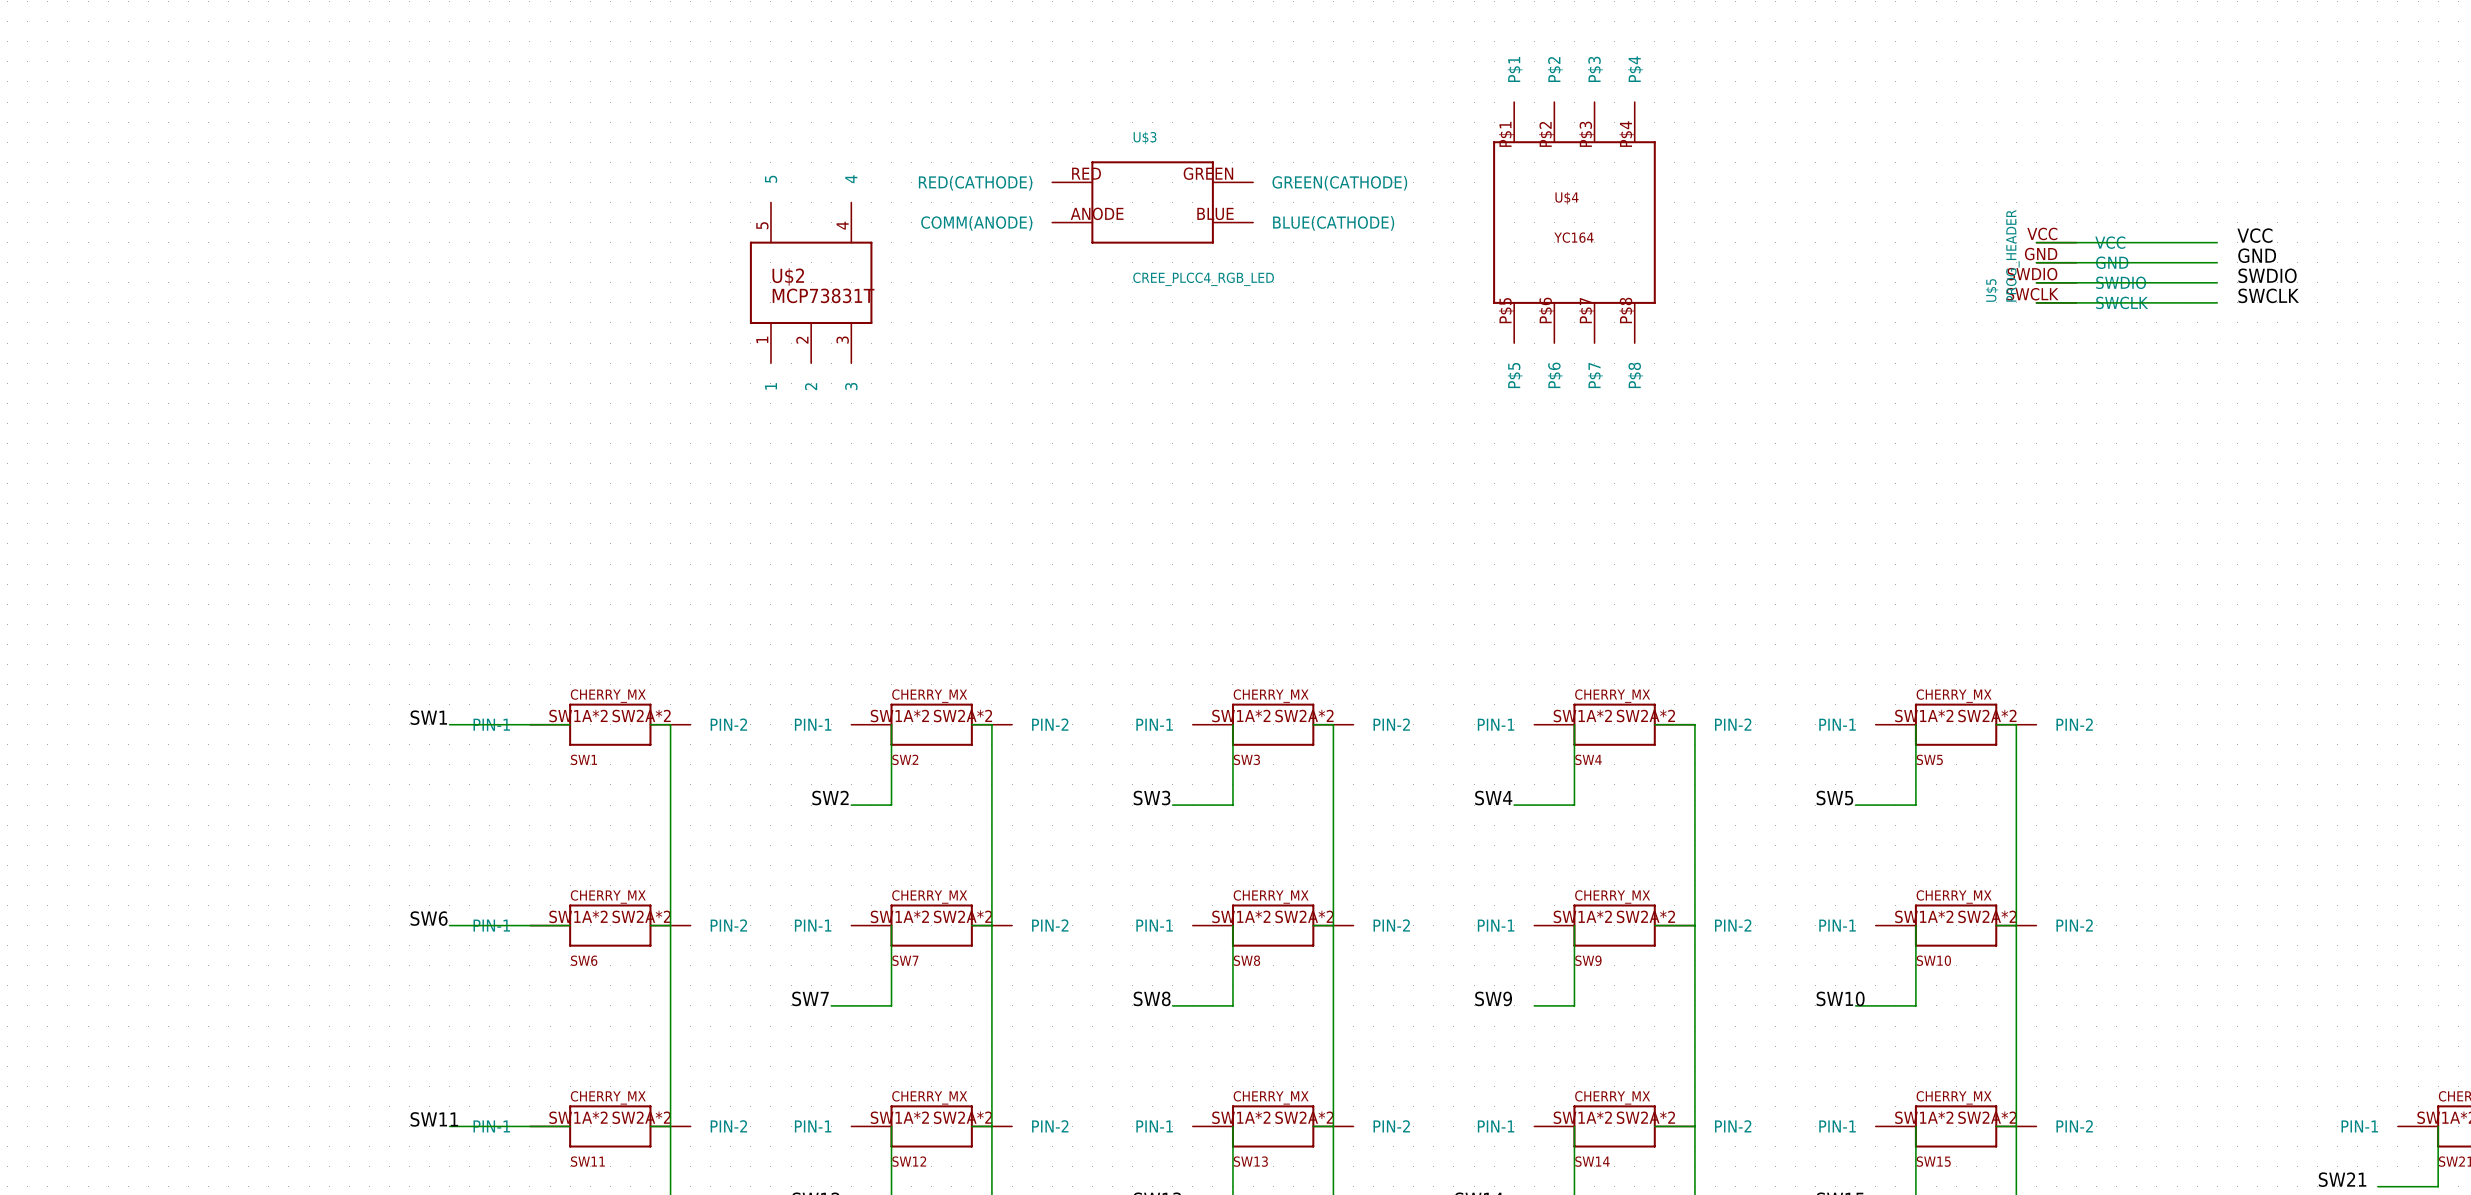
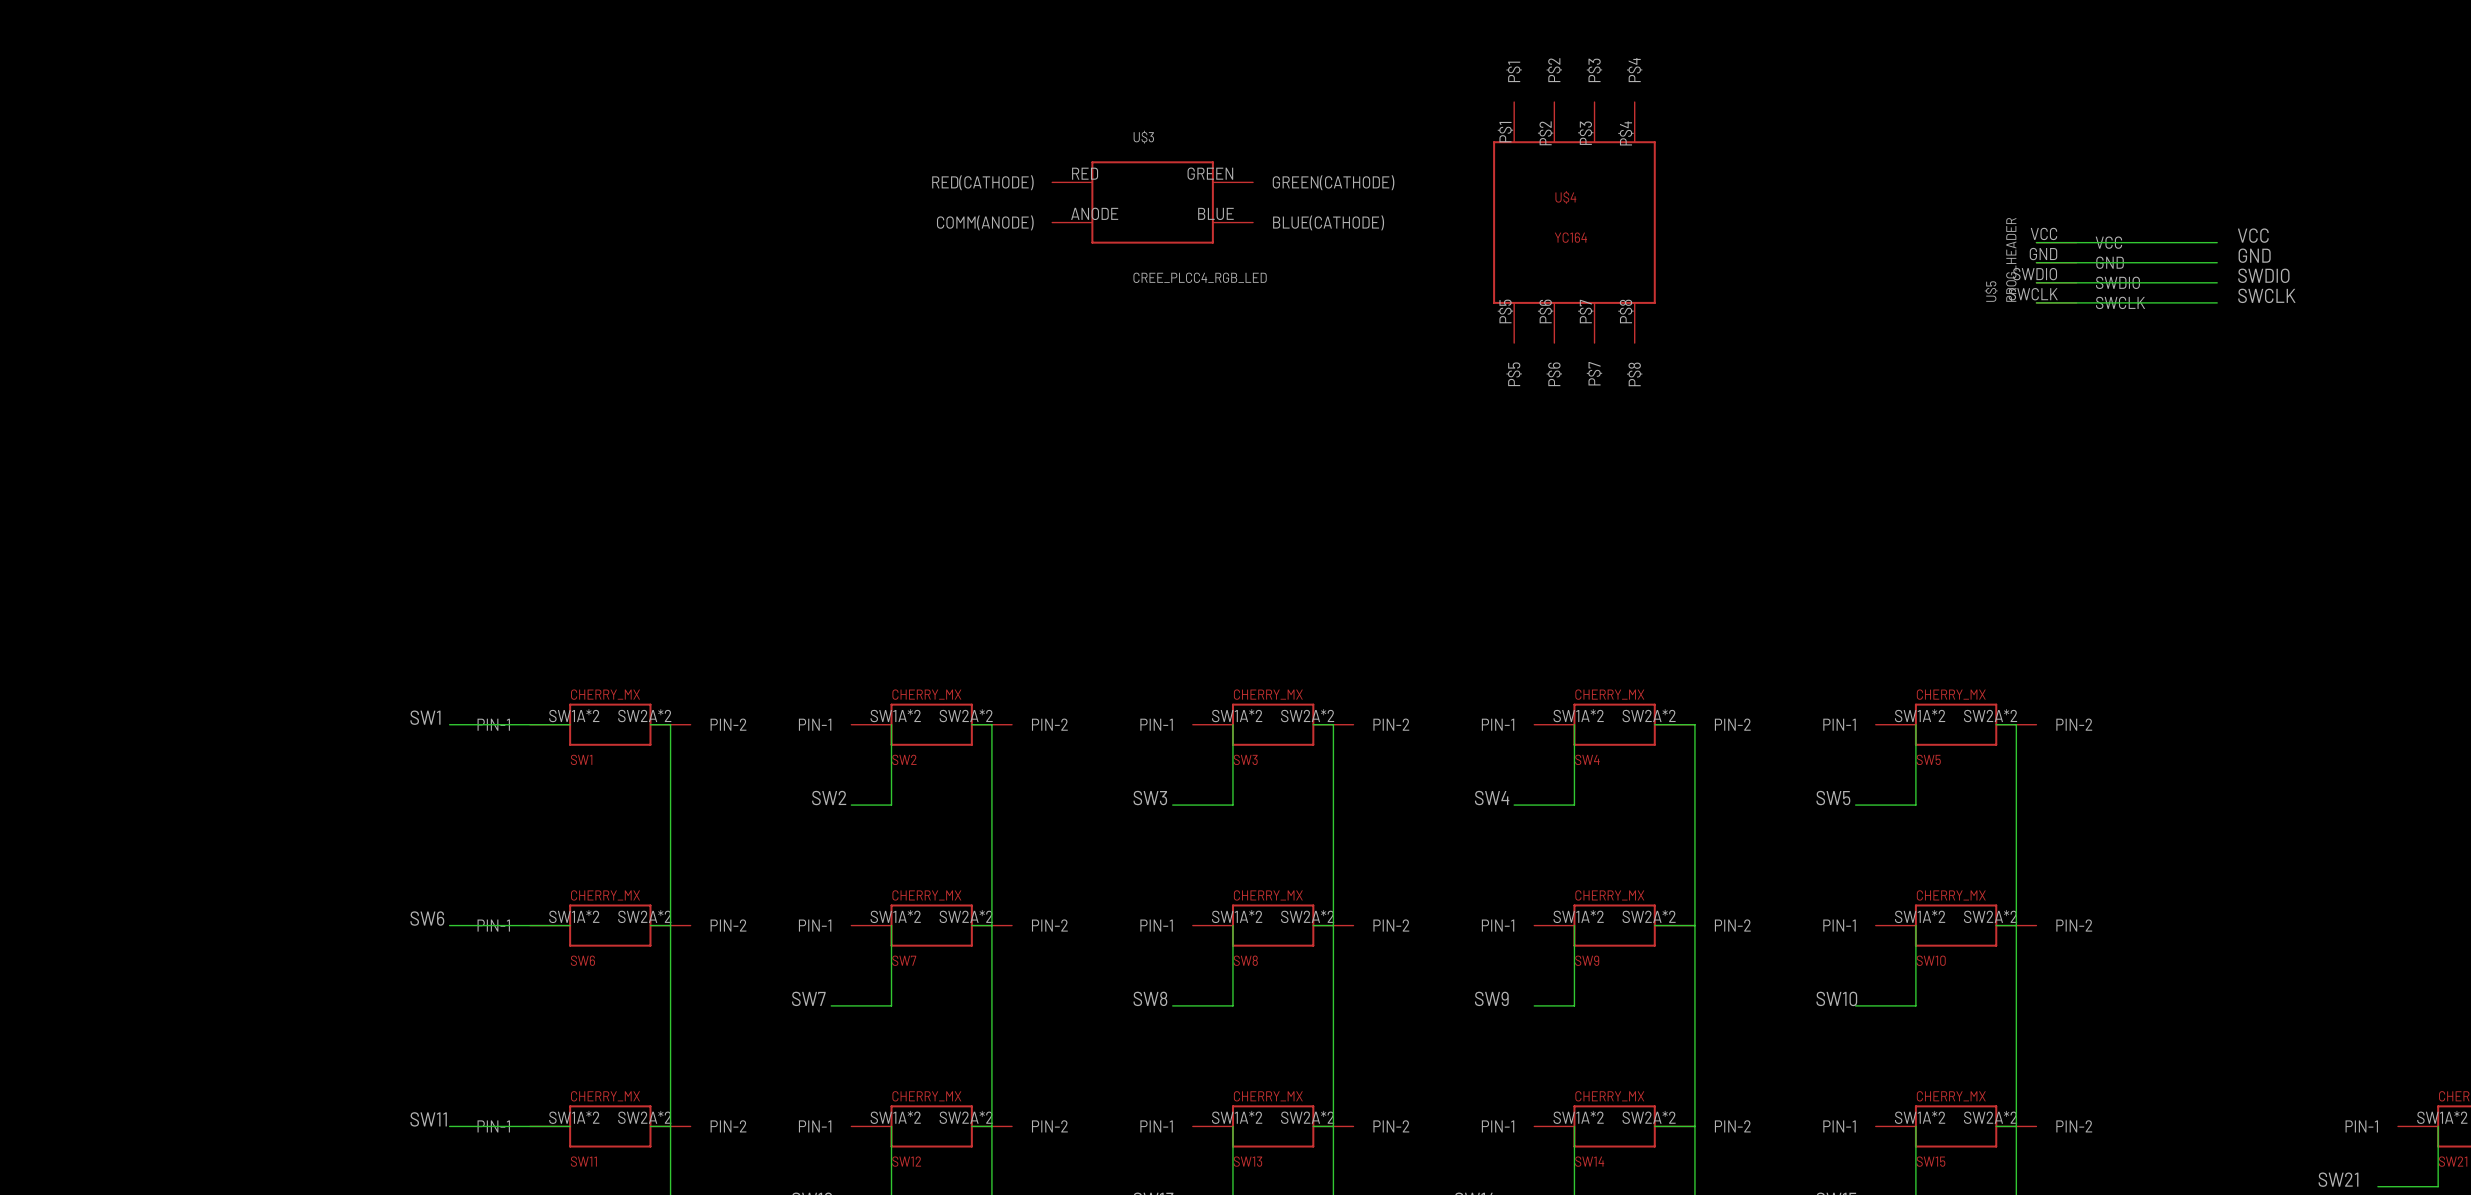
U$2: MCP73831T (811, 282) -> none

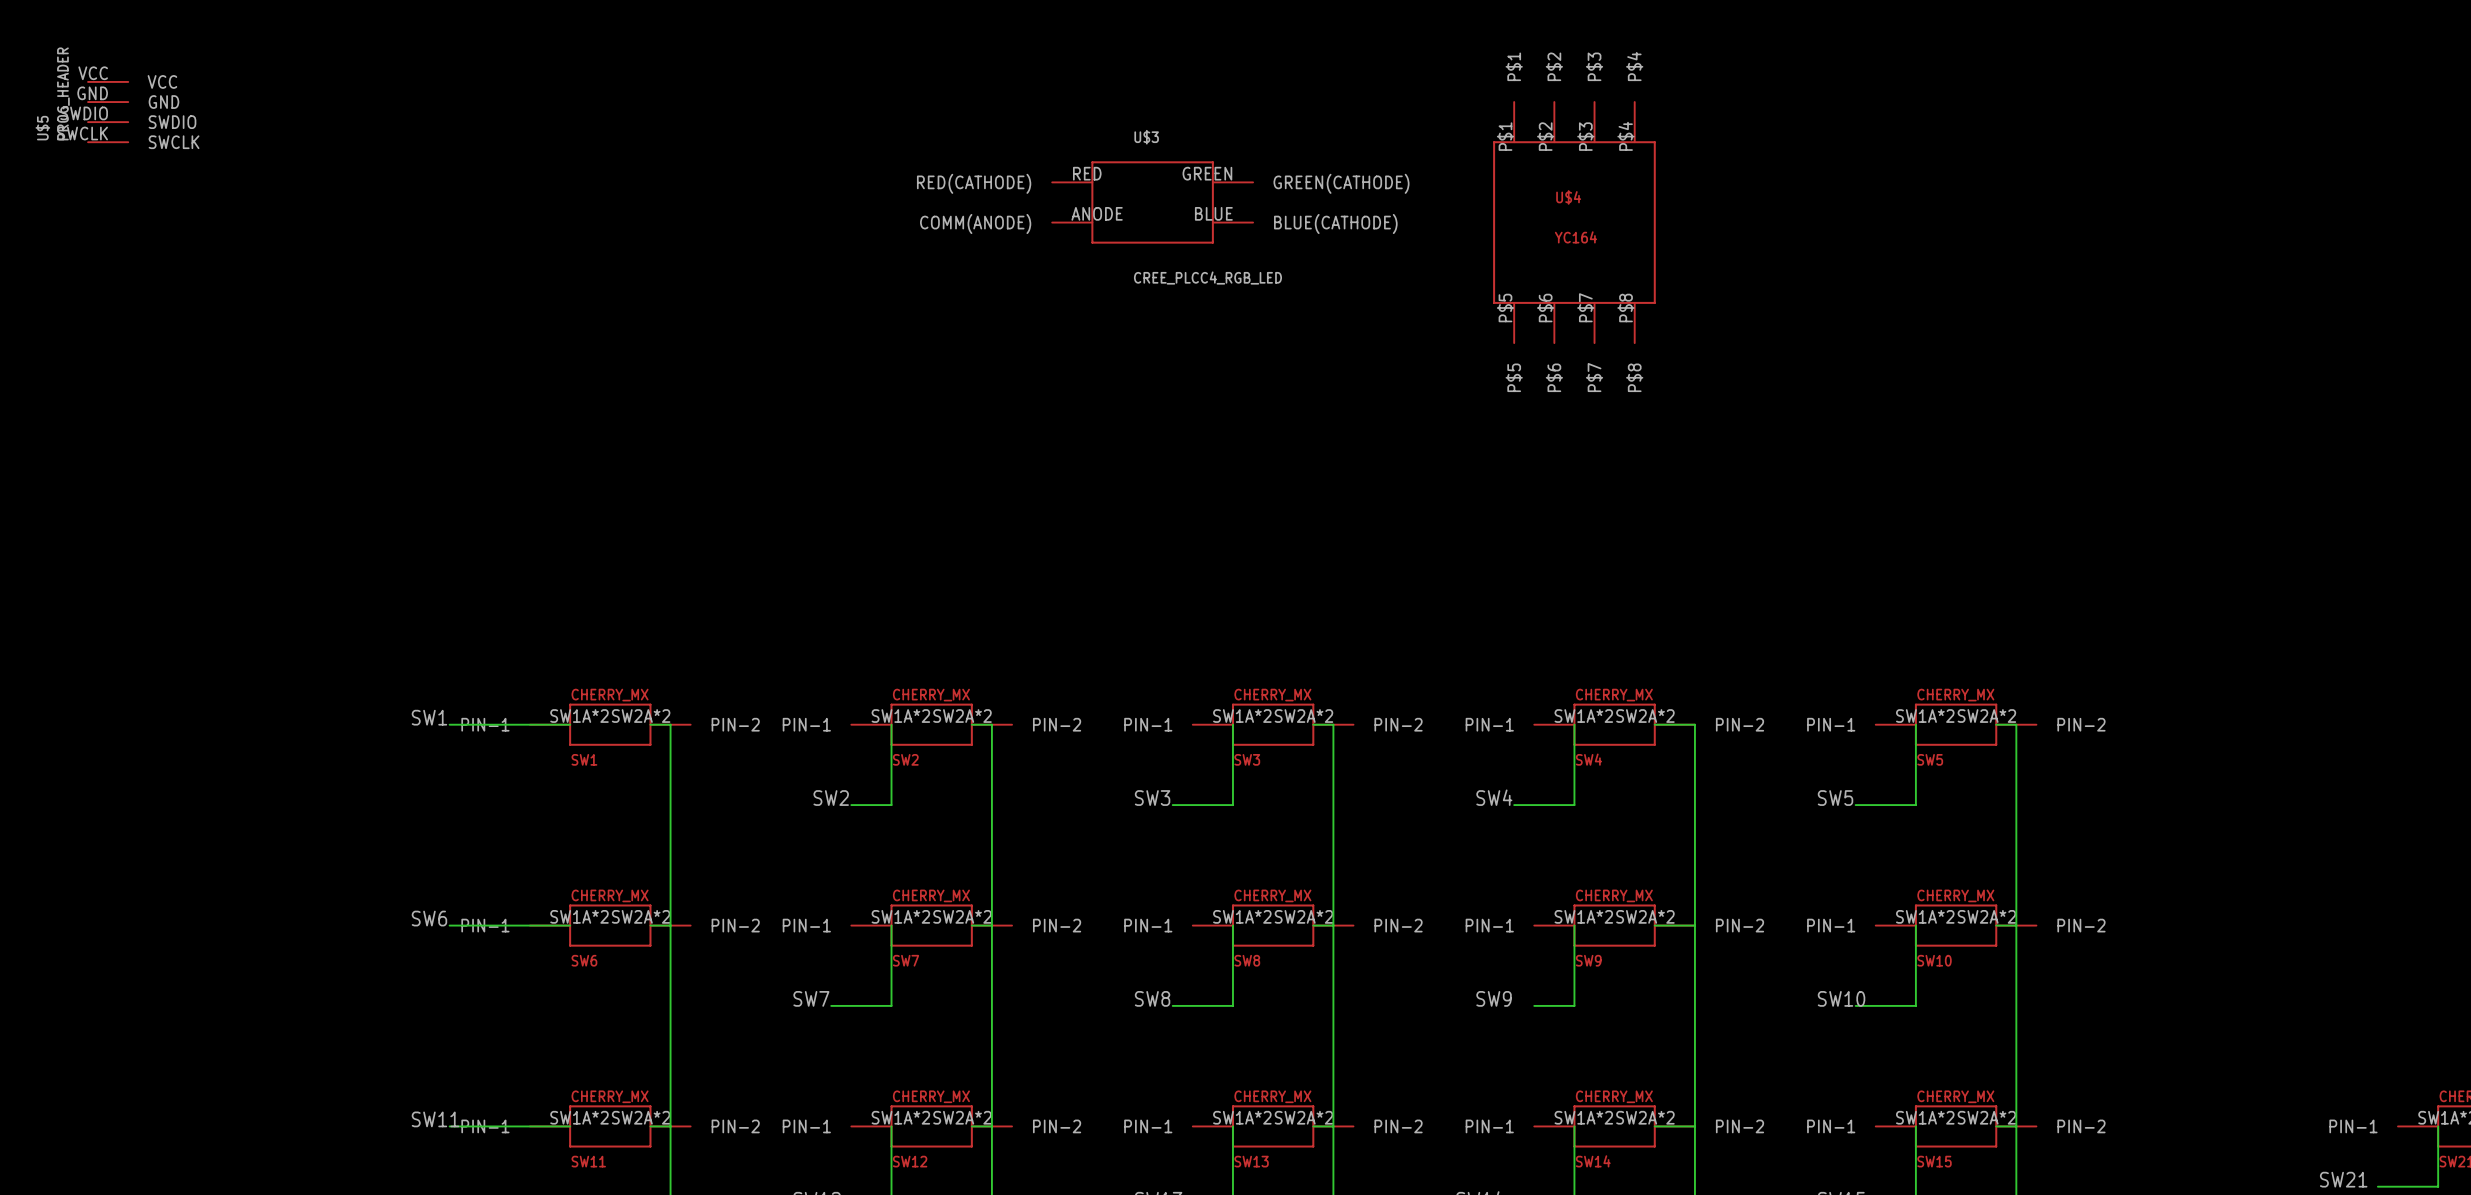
label: VCC (2253, 235) -> none
wire: (2036, 242) (2217, 242) -> none
label: GND (2254, 255) -> none
wire: (2036, 262) (2217, 262) -> none
U$5 position: (2056, 272) -> (108, 112)
label: SWDIO (2263, 275) -> none
wire: (2036, 282) (2217, 282) -> none
label: SWCLK (2266, 295) -> none
wire: (2036, 302) (2217, 302) -> none

